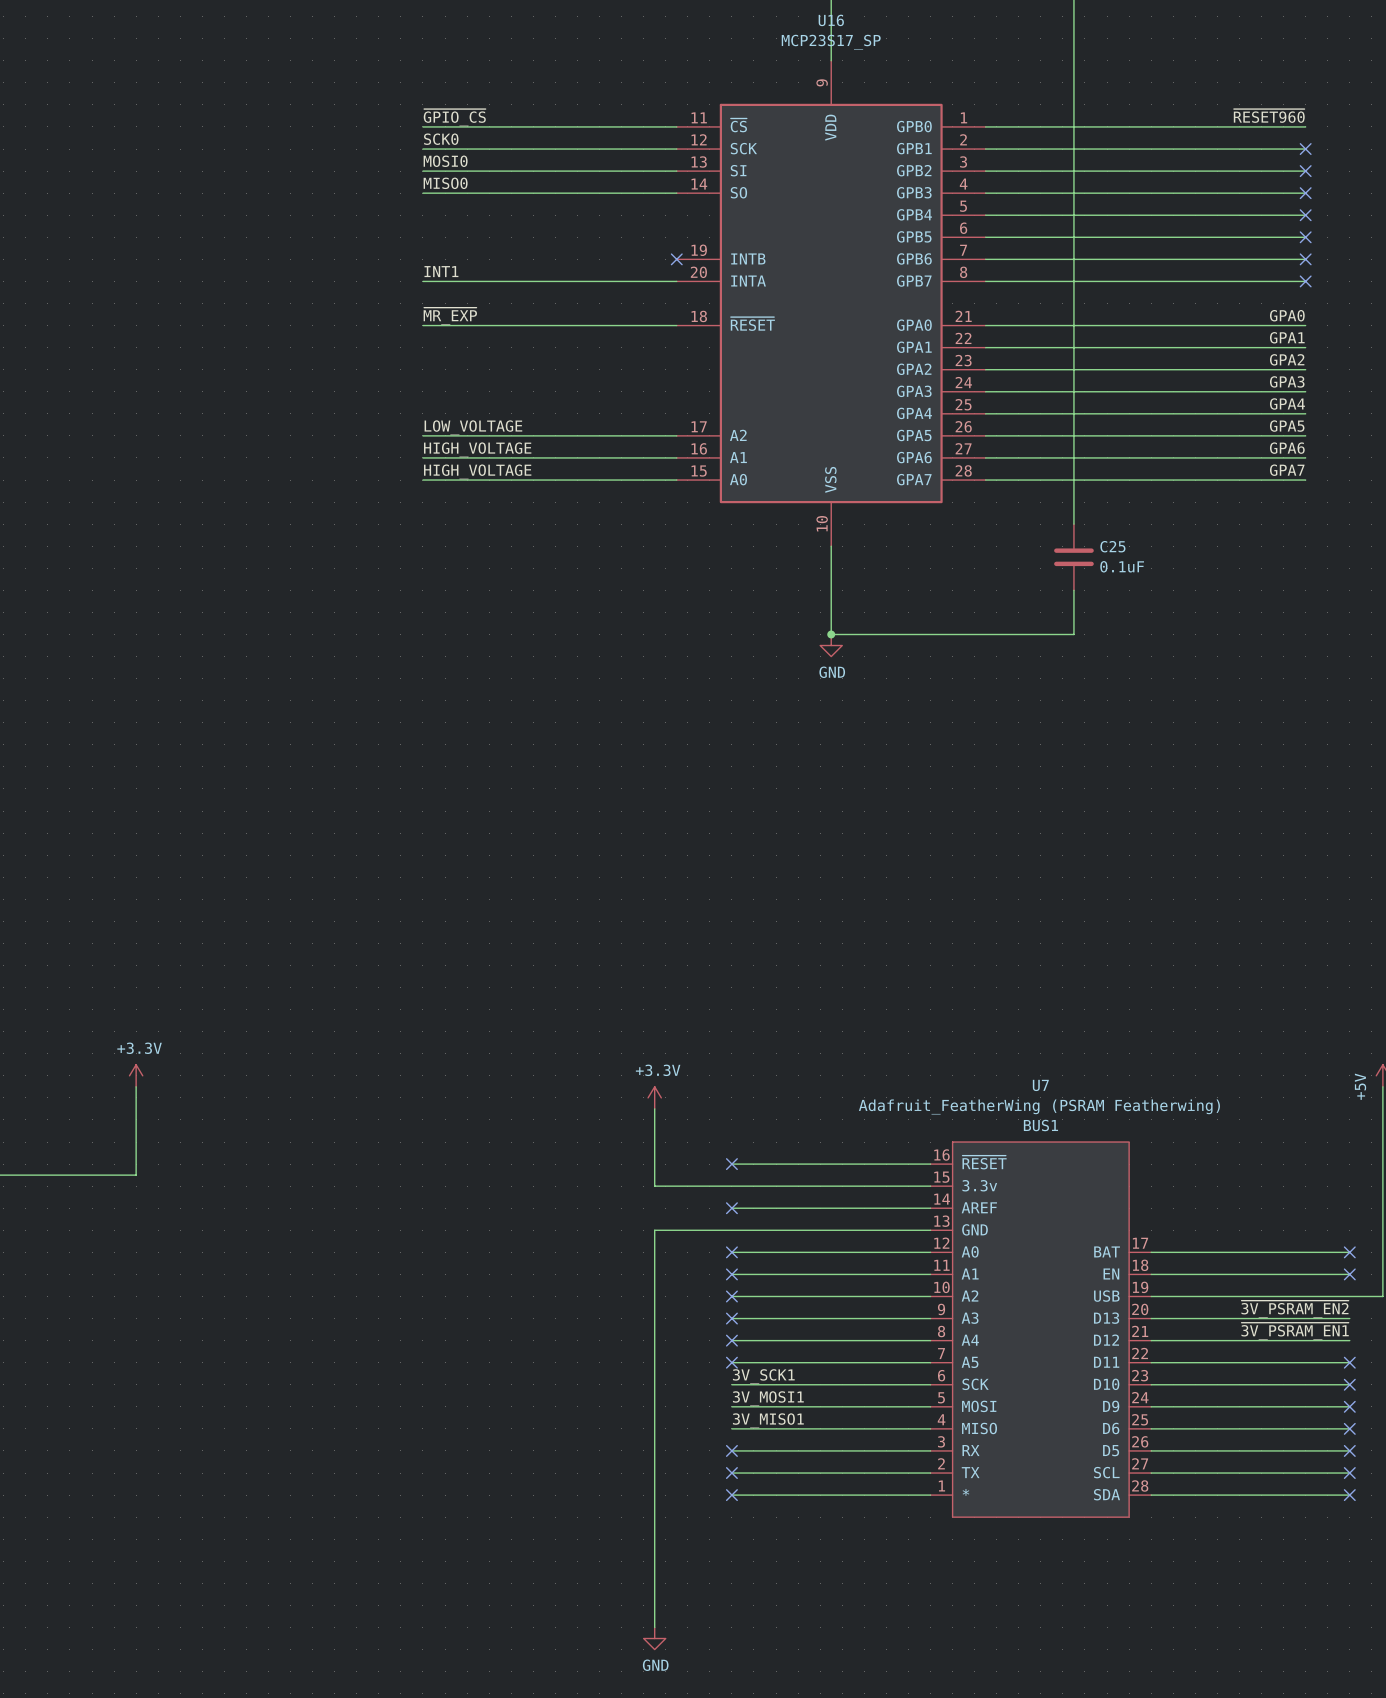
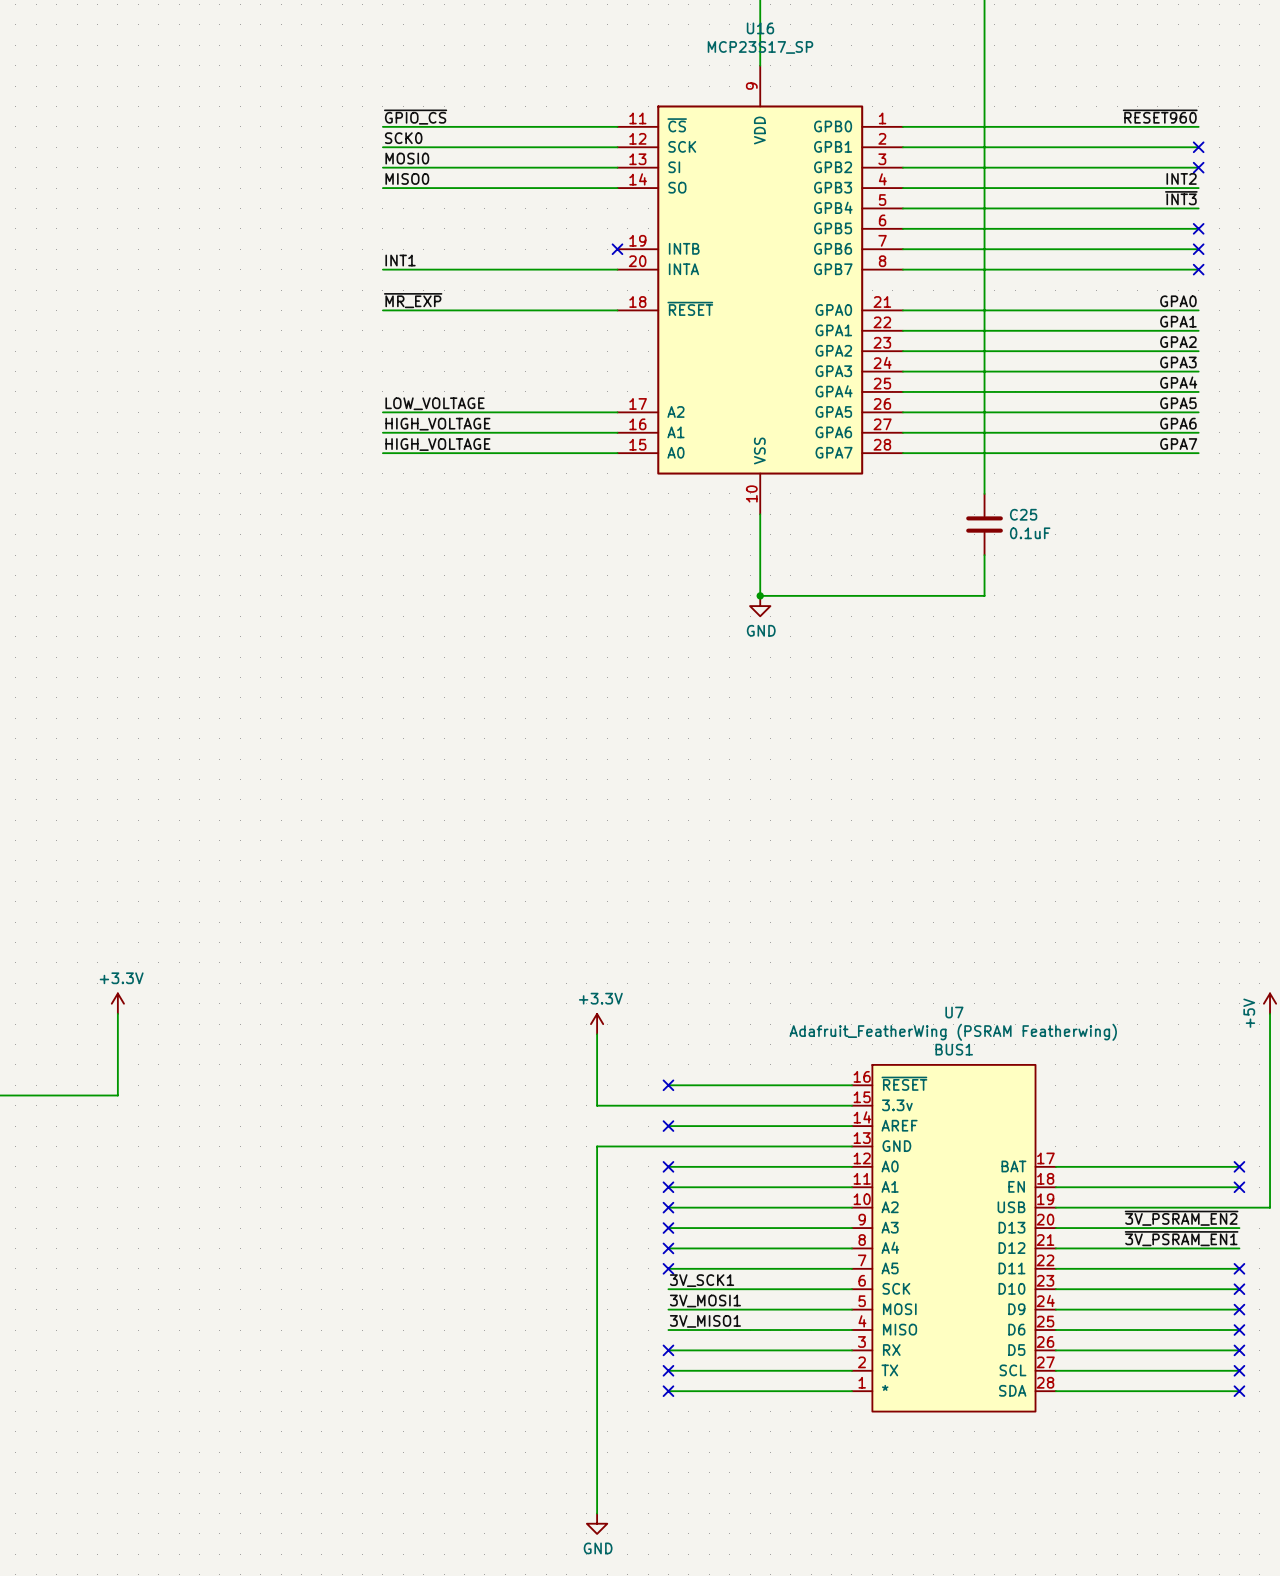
label: none -> INT2 (1181, 178)
no-connect mark: (1305, 193) -> none
label: none -> ~{INT3} (1181, 198)
no-connect mark: (1305, 215) -> none

